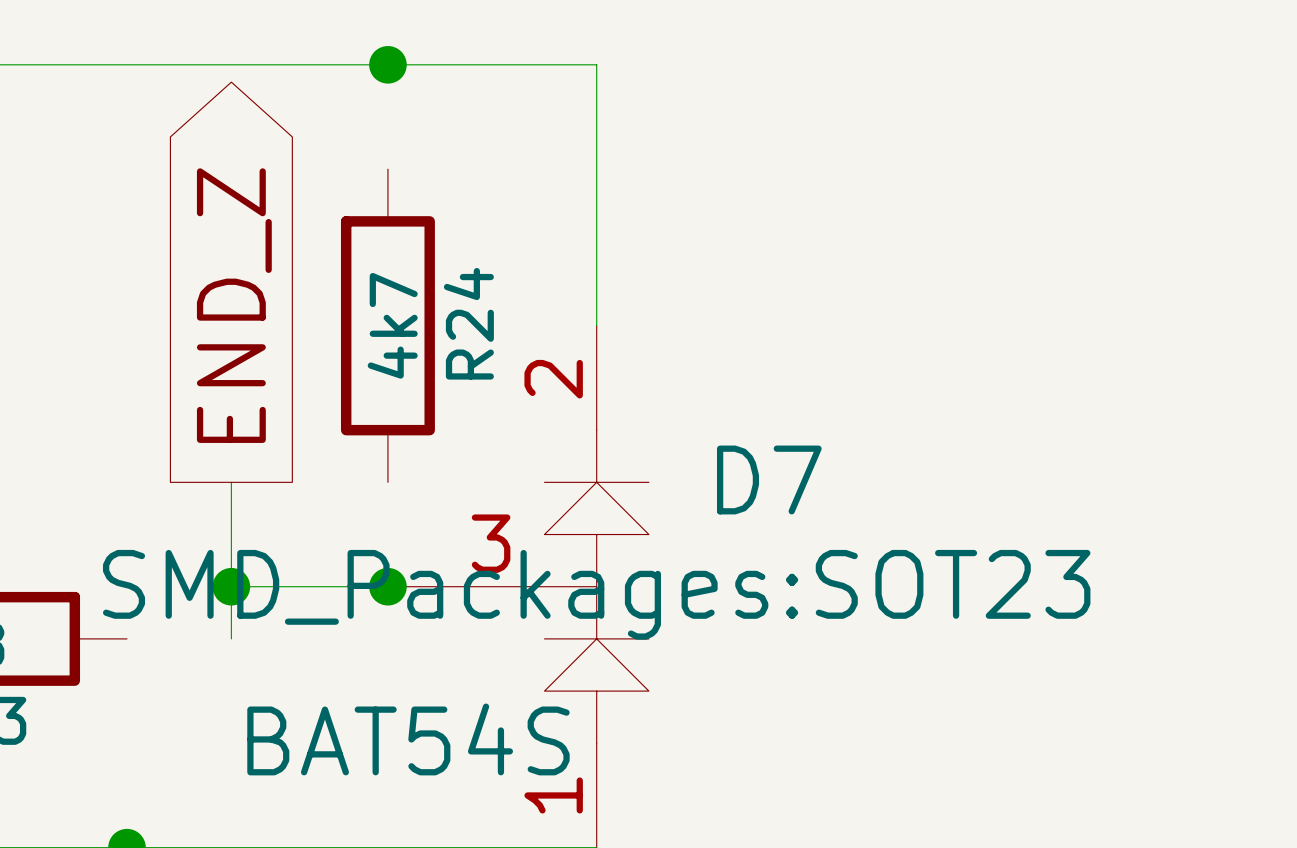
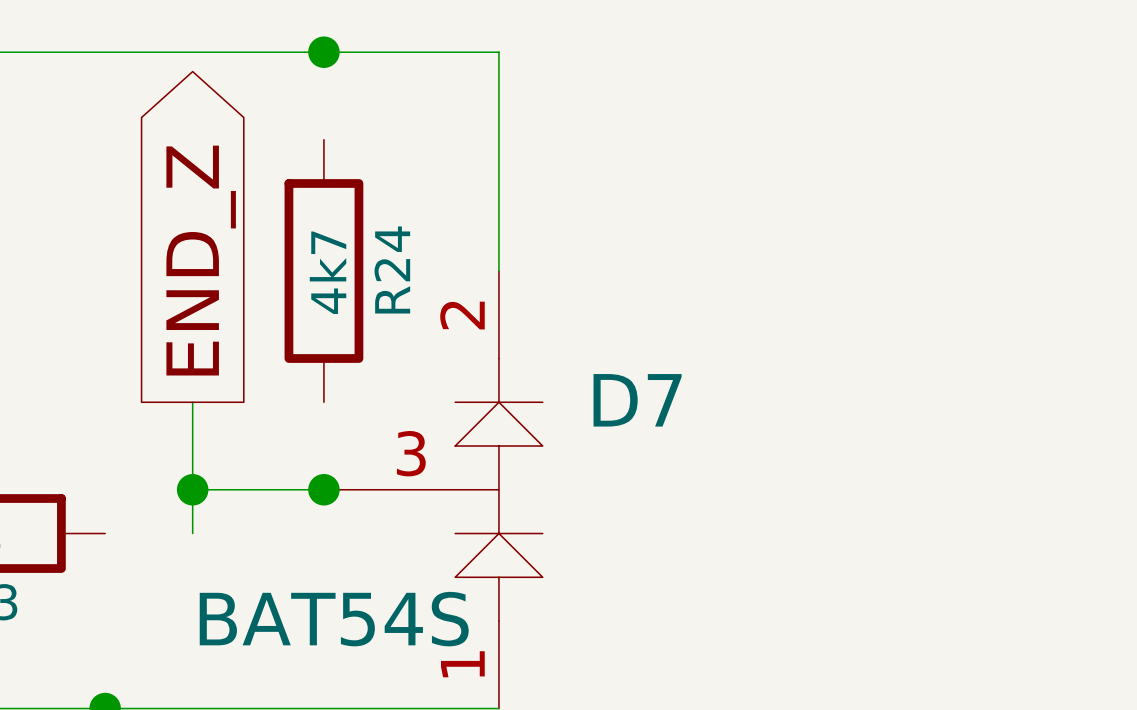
D7 text: SMD_Packages:SOT23 (596, 594) -> none

